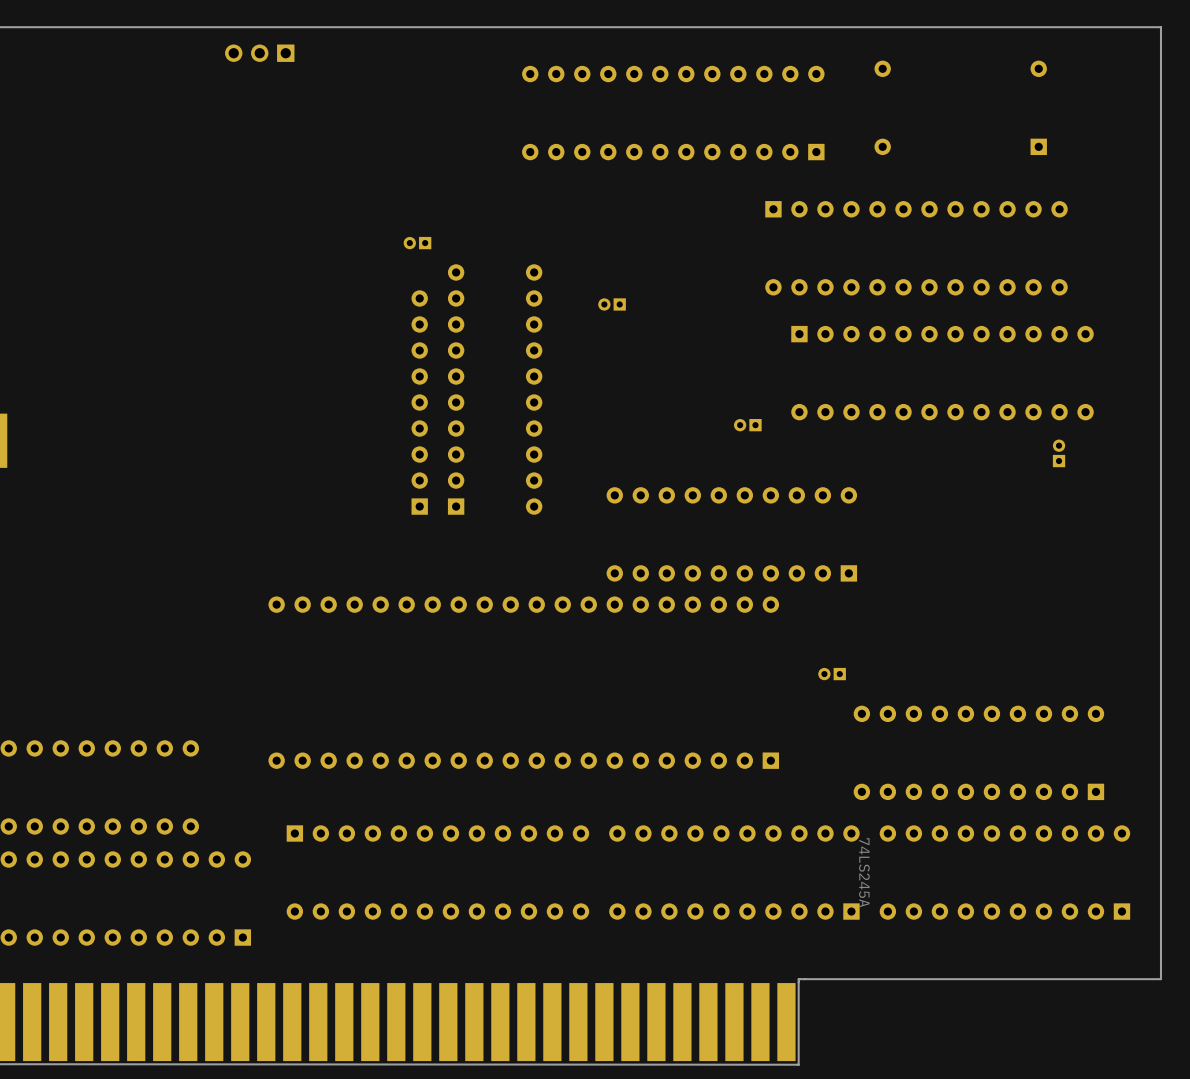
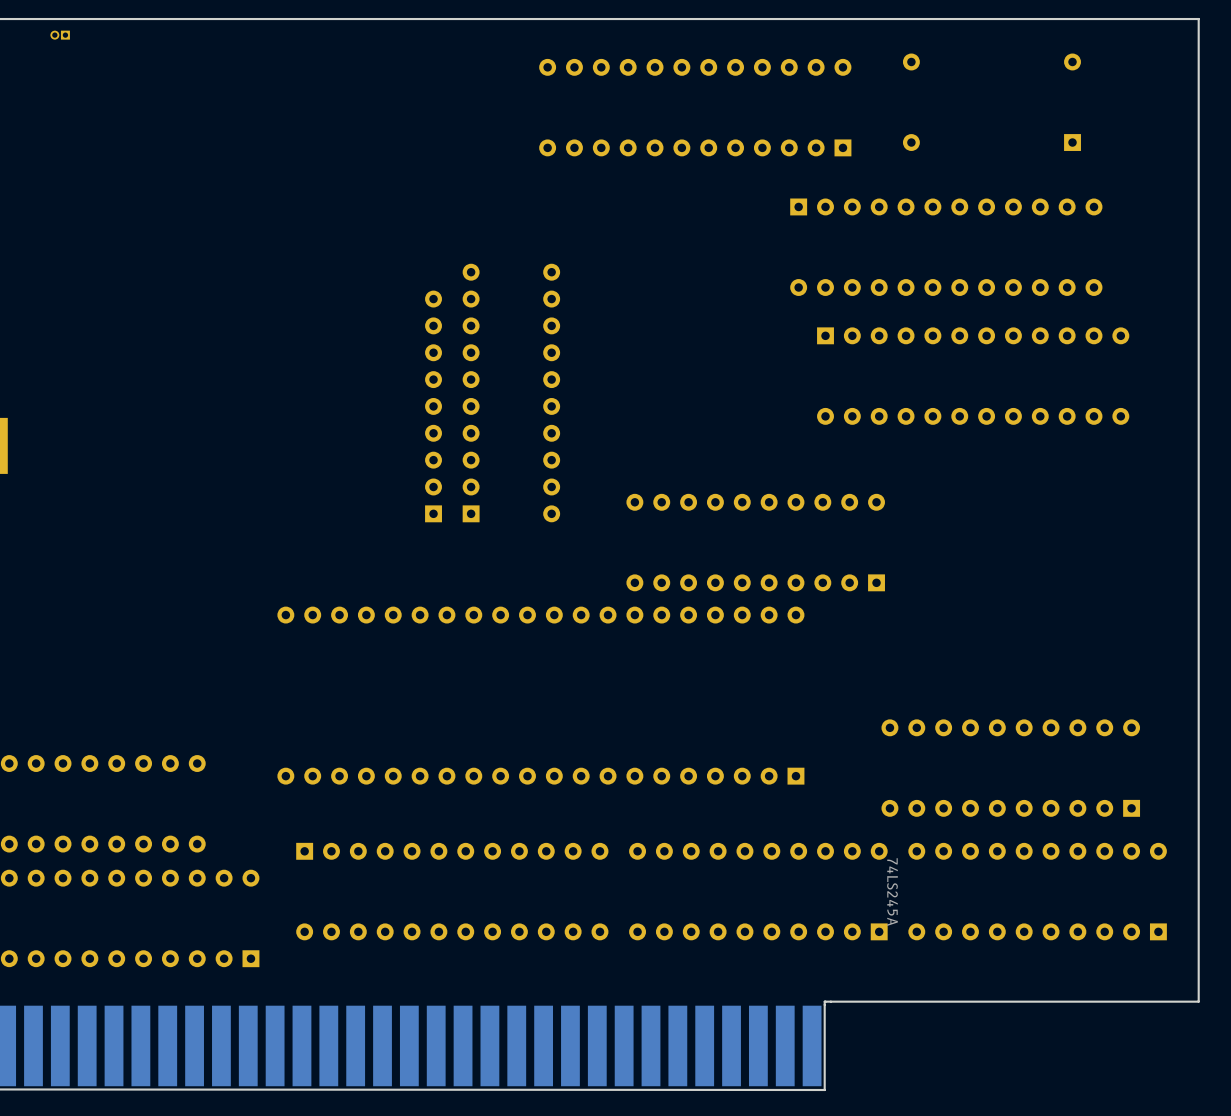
part: none -> (60, 35)
part: (259, 53) -> none
part: (417, 243) -> none
part: (612, 304) -> none
part: (747, 425) -> none
part: (1059, 453) -> none
part: (832, 674) -> none

